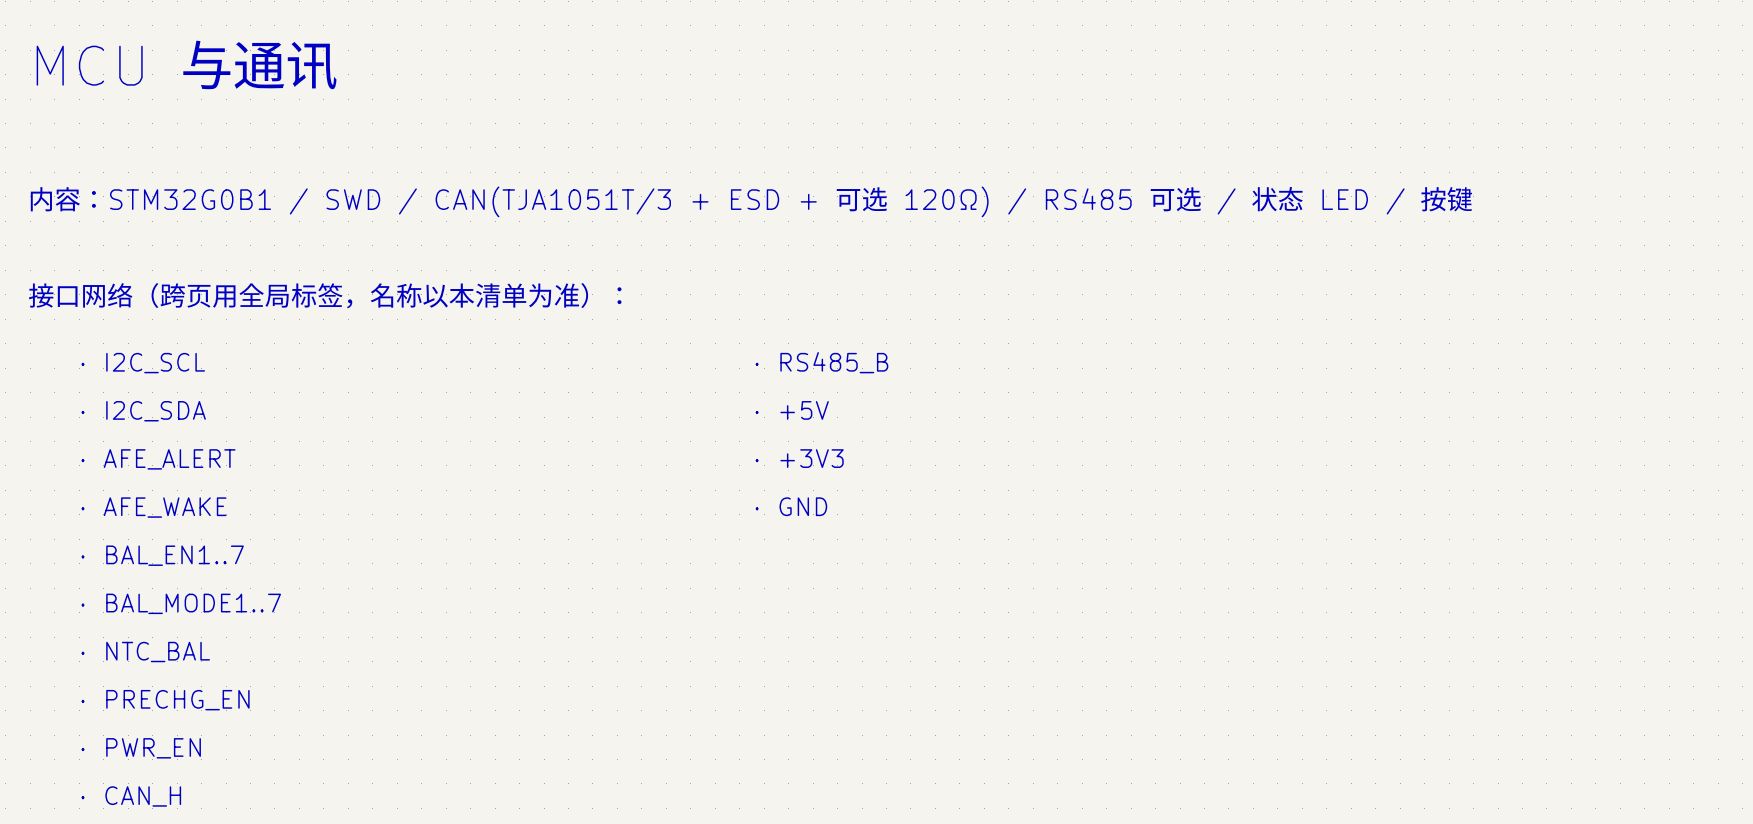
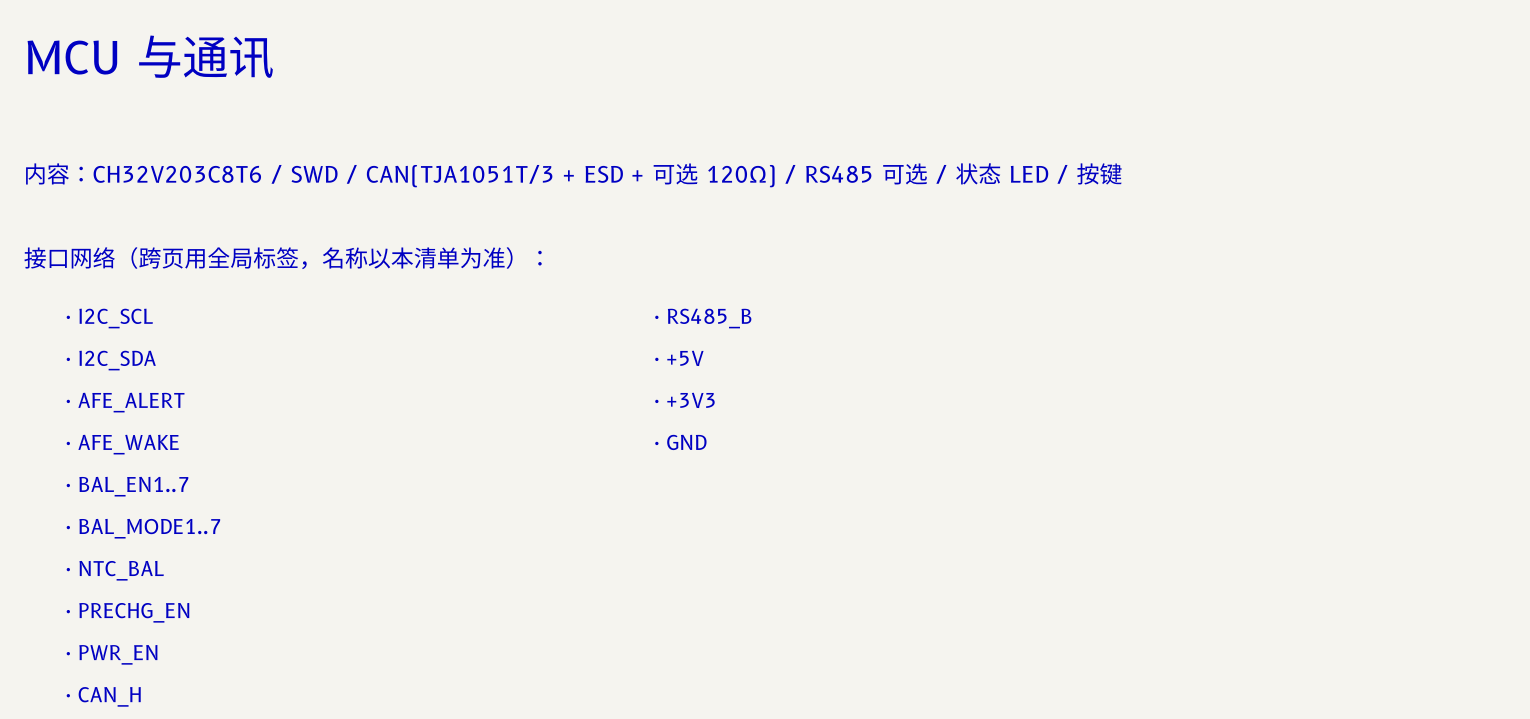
text: 内容：STM32G0B1 / SWD / CAN(TJA1051T/3 + ESD + 可选 120Ω) / RS485 可选 / 状态 LED / 按键 (751, 201) -> 内容：CH32V203C8T6 / SWD / CAN(TJA1051T/3 + ESD + 可选 120Ω) / RS485 可选 / 状态 LED / 按键 (573, 175)

